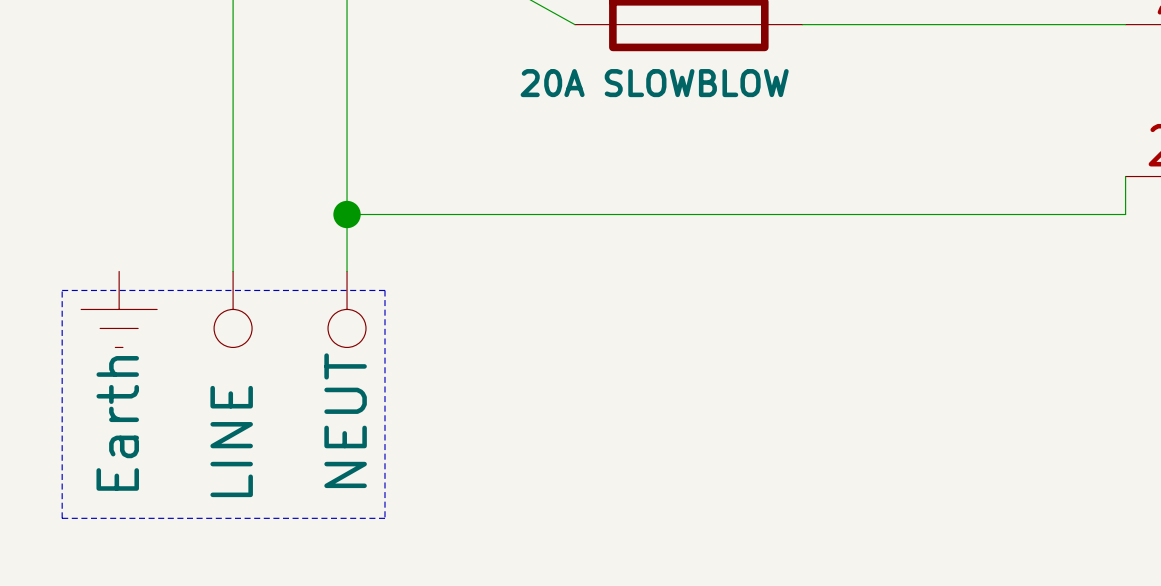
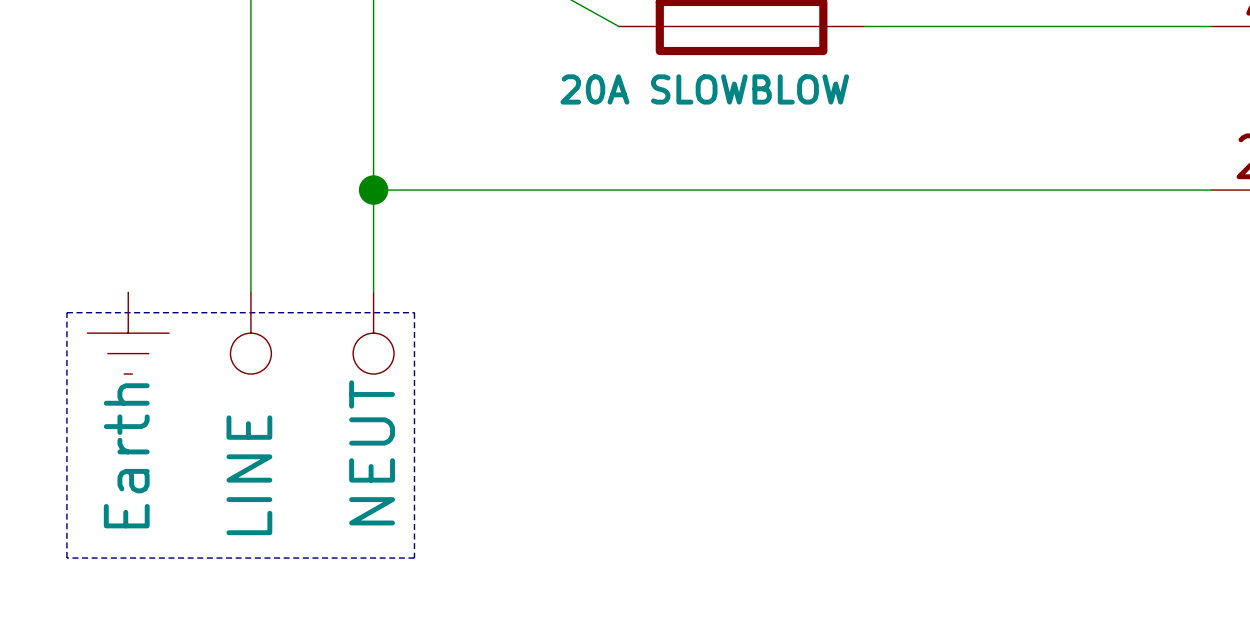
wire: (1125, 176) (1125, 214) (347, 214) -> (1211, 190) (373, 190)
junction position: (347, 214) -> (373, 190)

